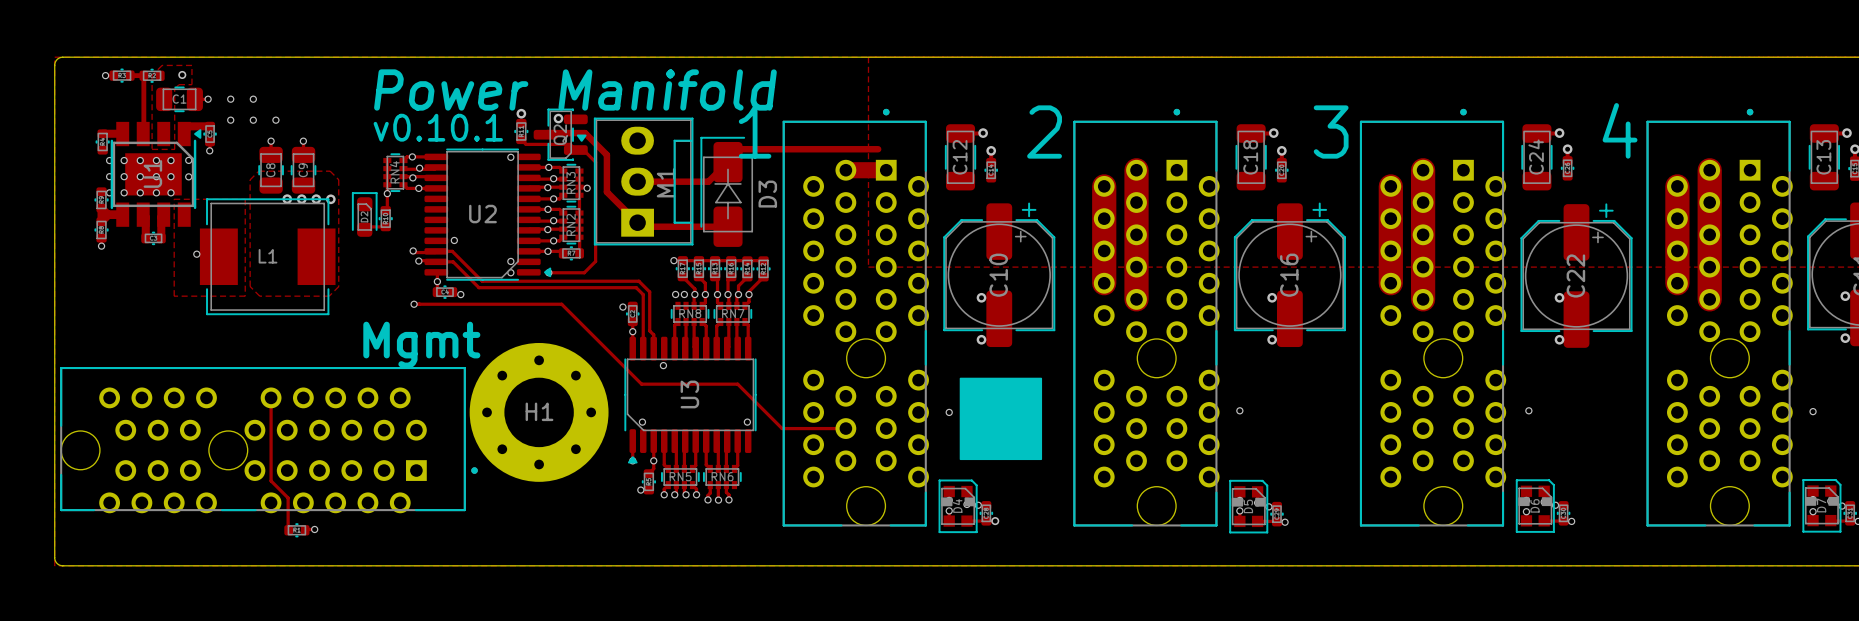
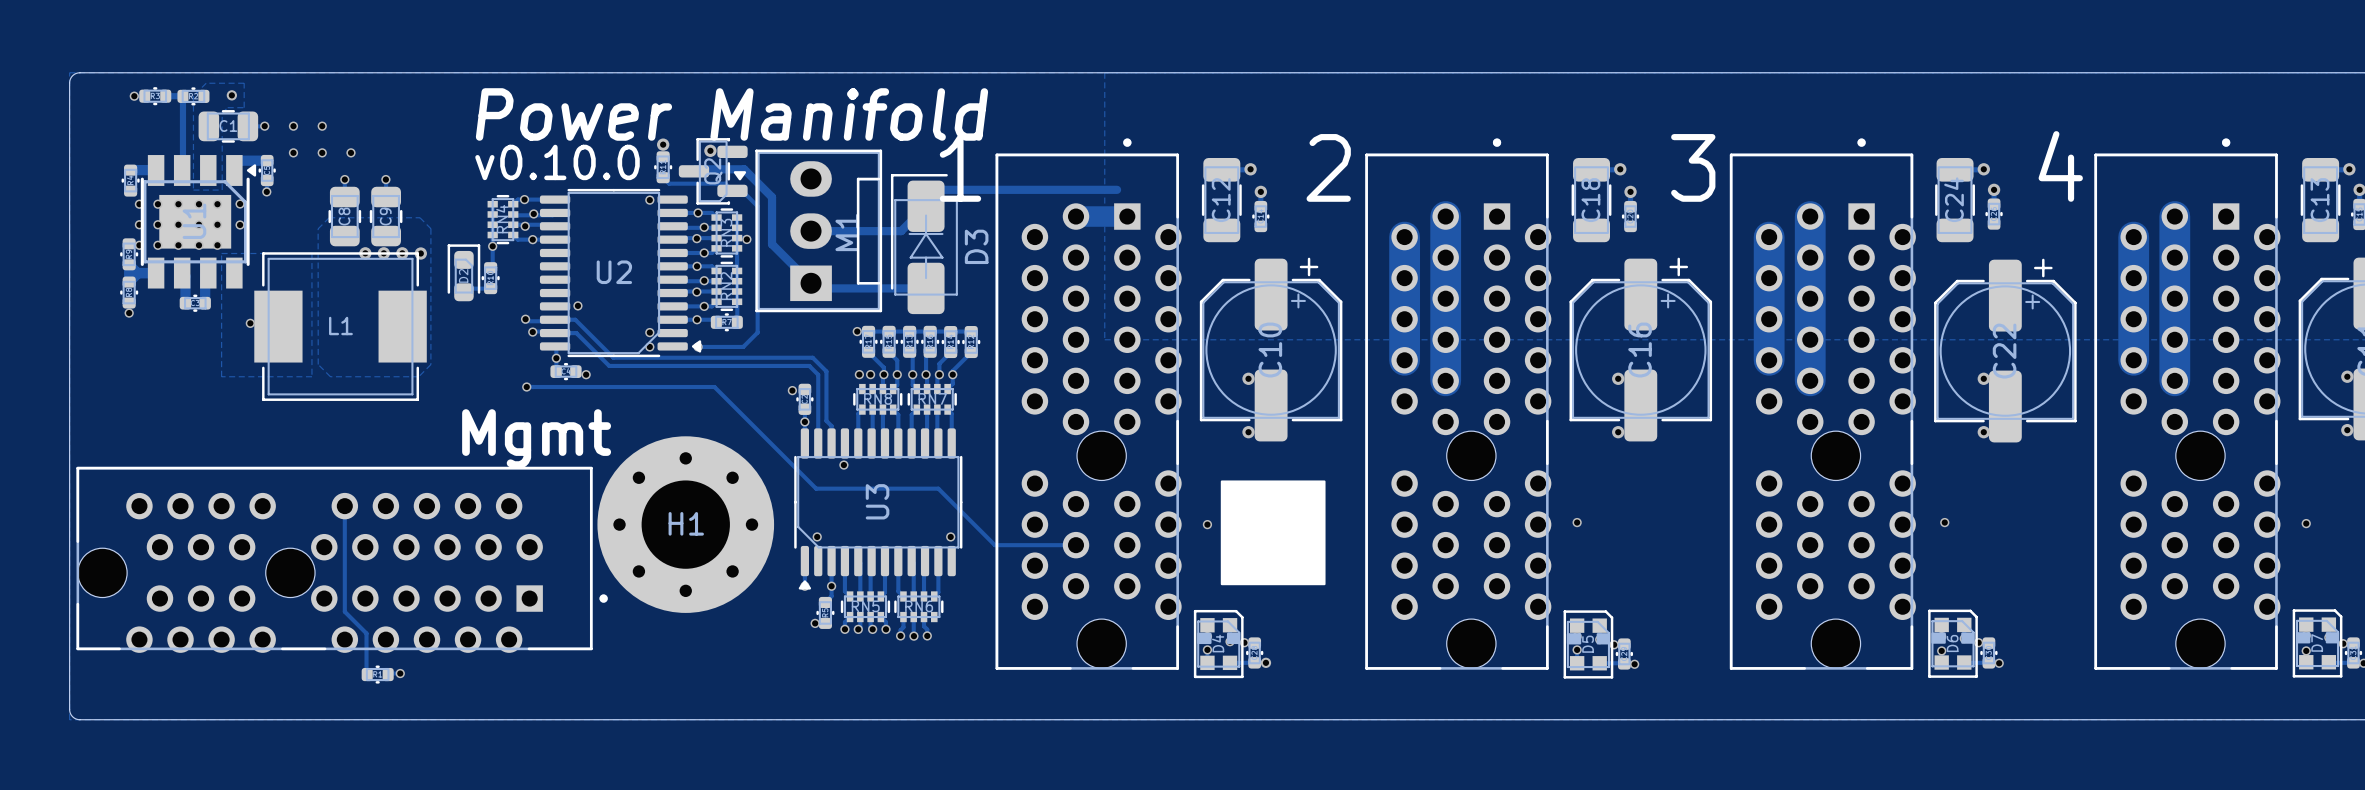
text: v0.10.1 (438, 127) -> v0.10.0 (557, 162)

